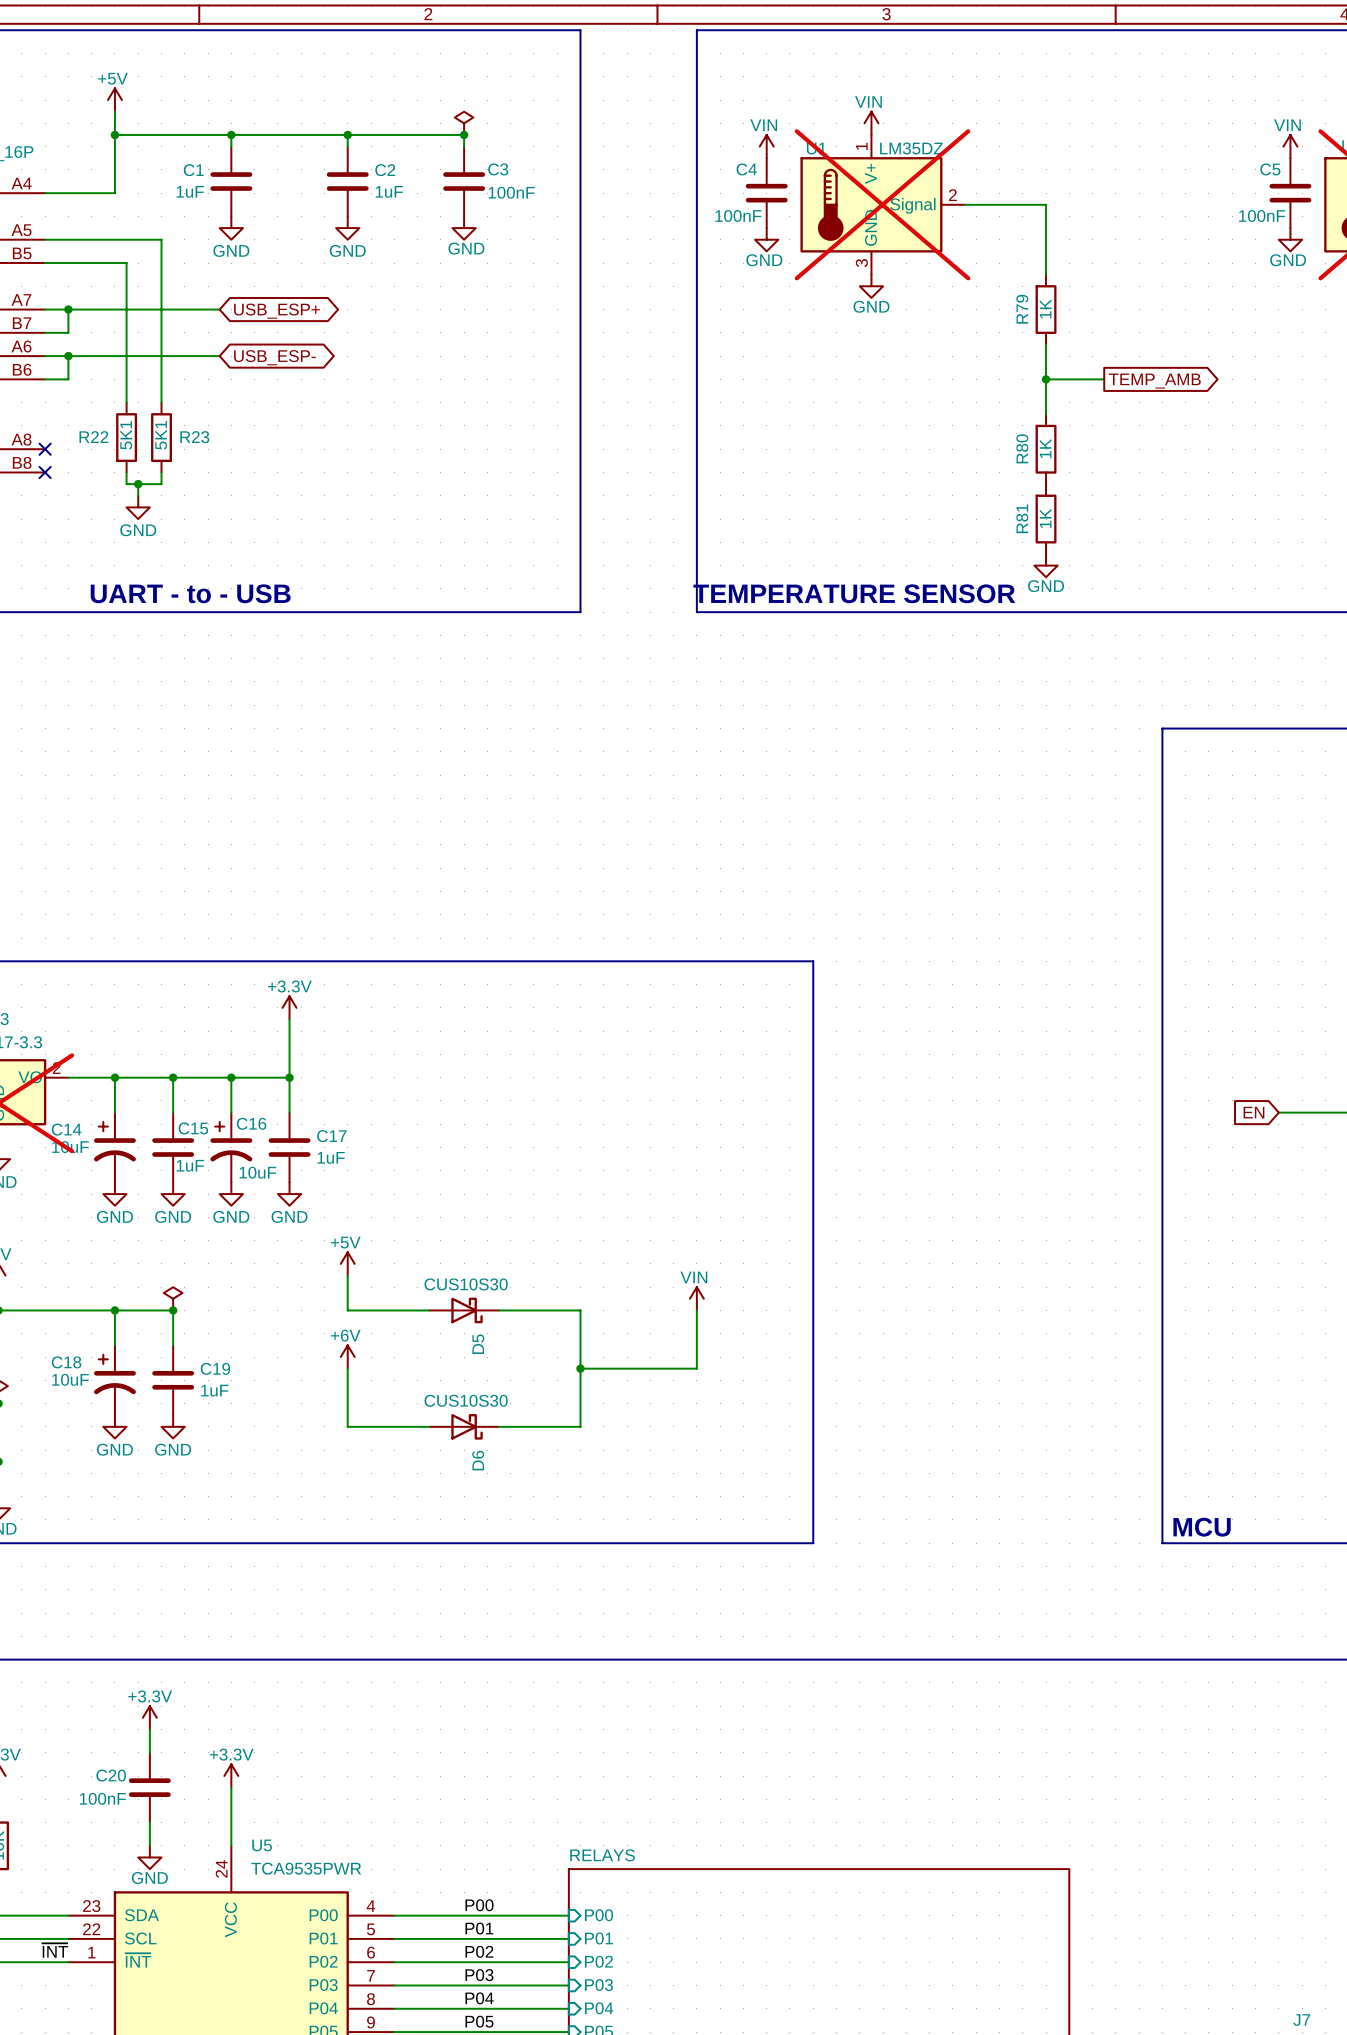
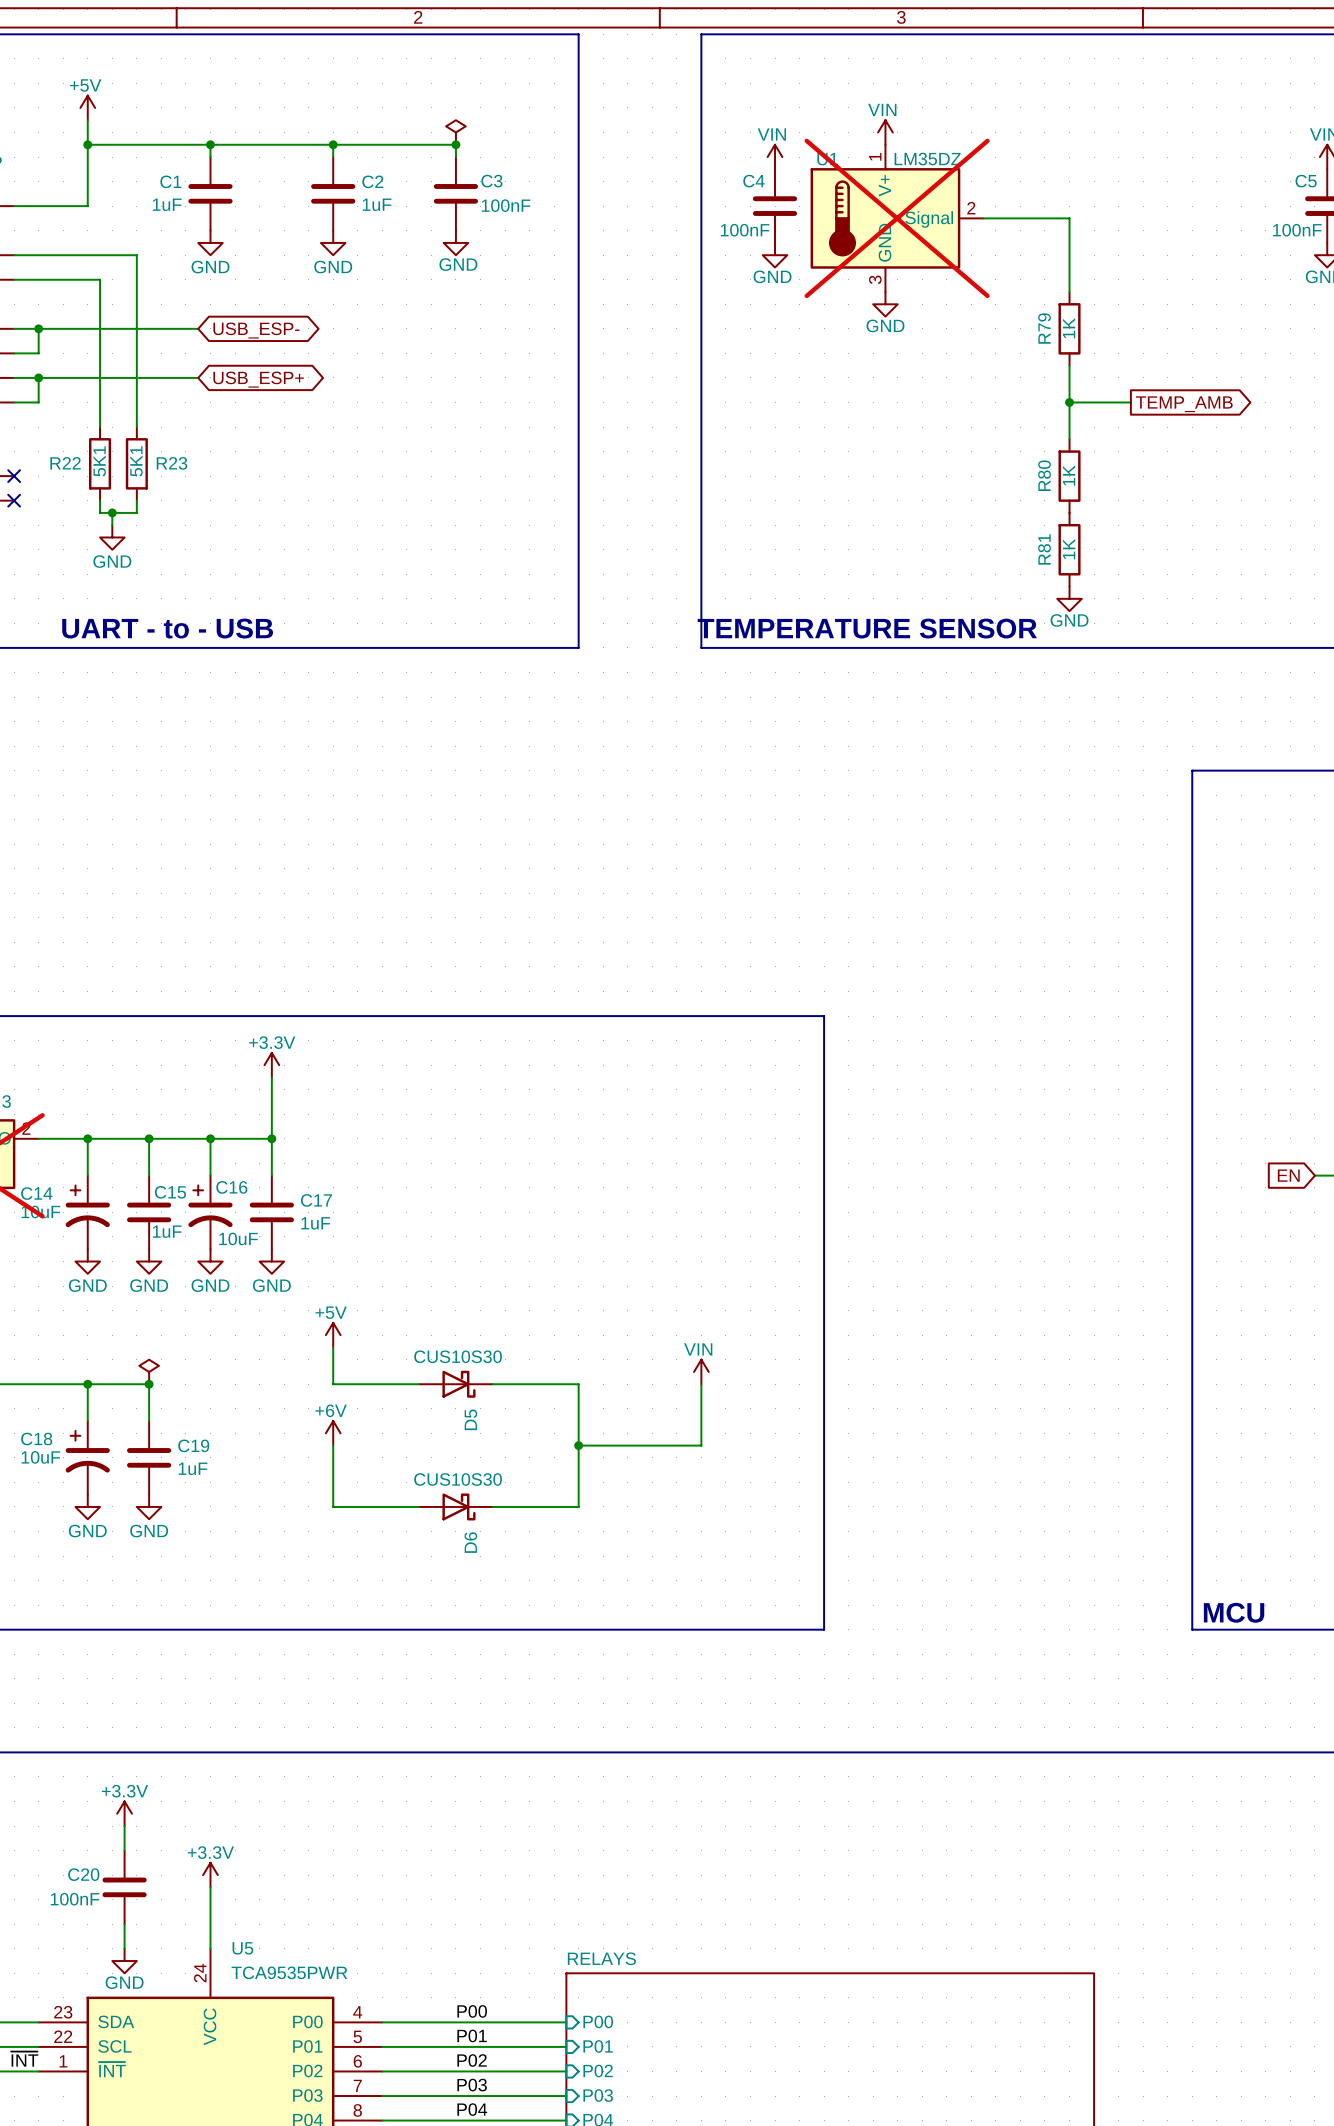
global label: USB_ESP+ (276, 311) -> USB_ESP- (256, 330)
global label: USB_ESP- (274, 357) -> USB_ESP+ (258, 379)

